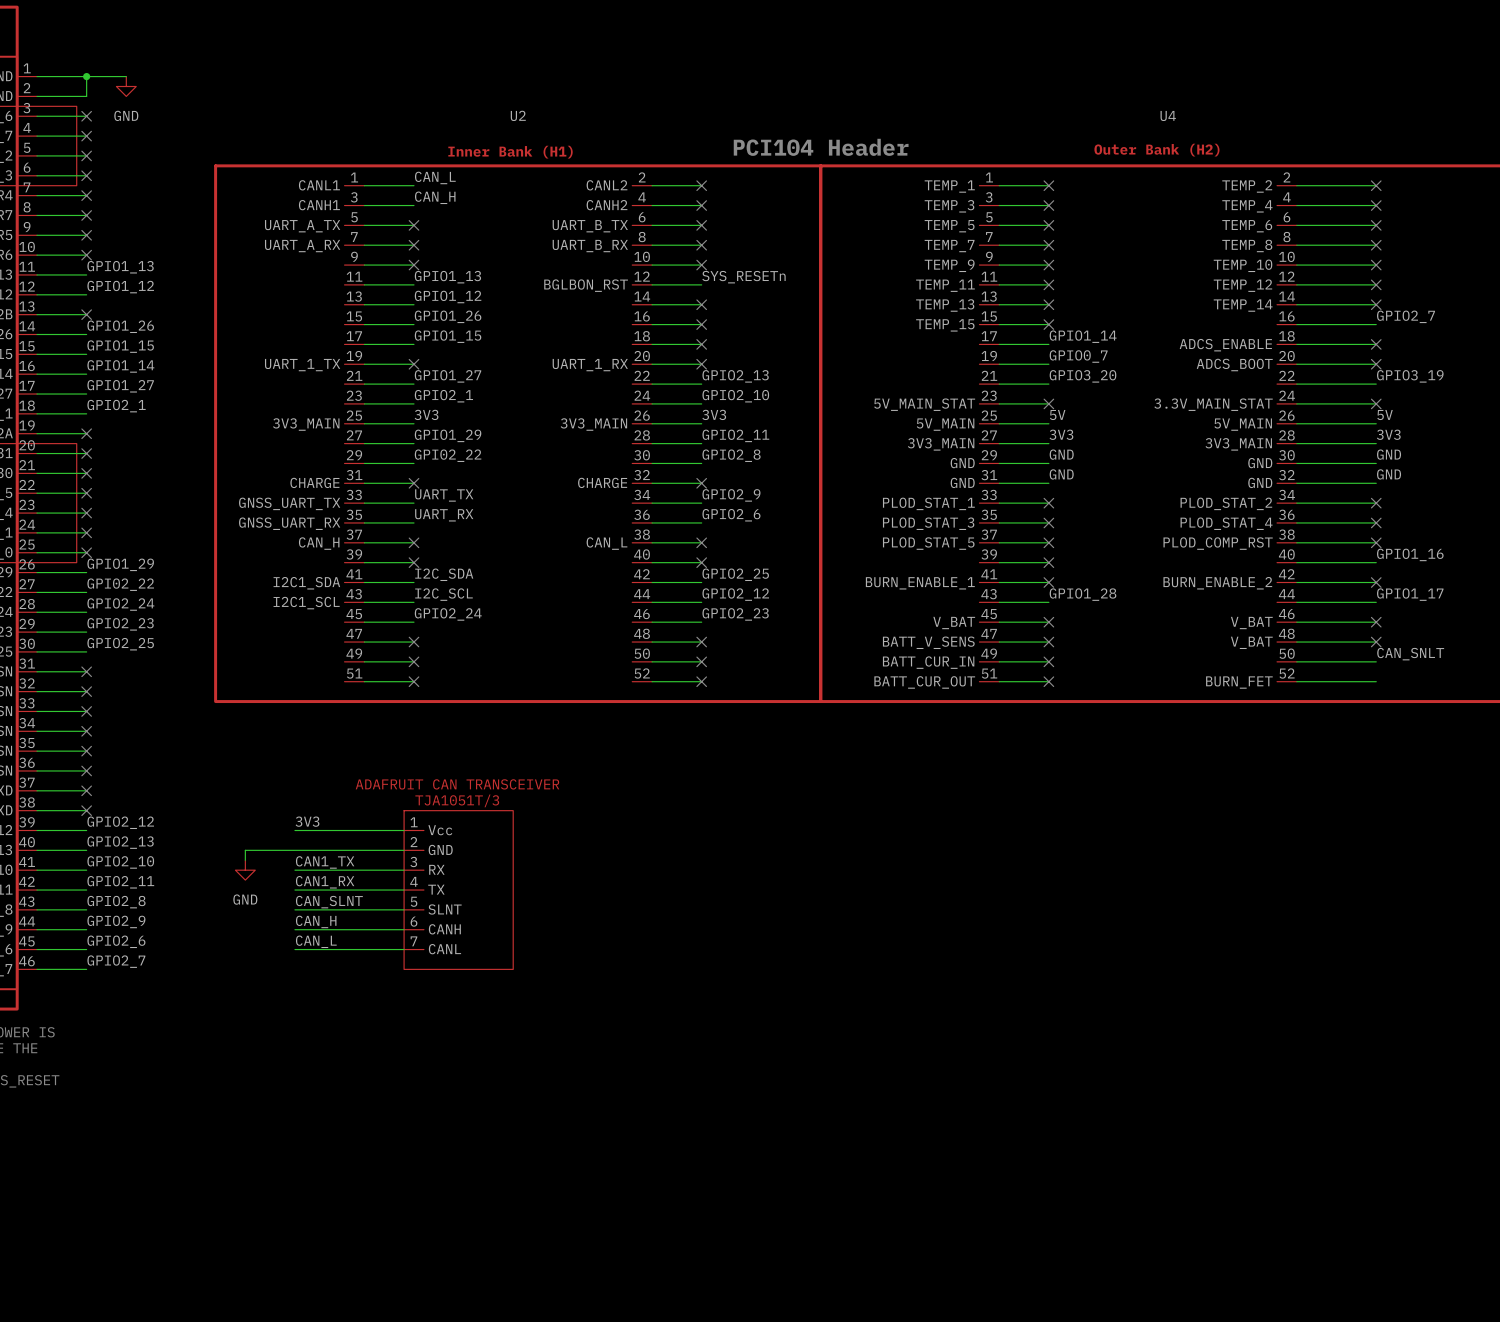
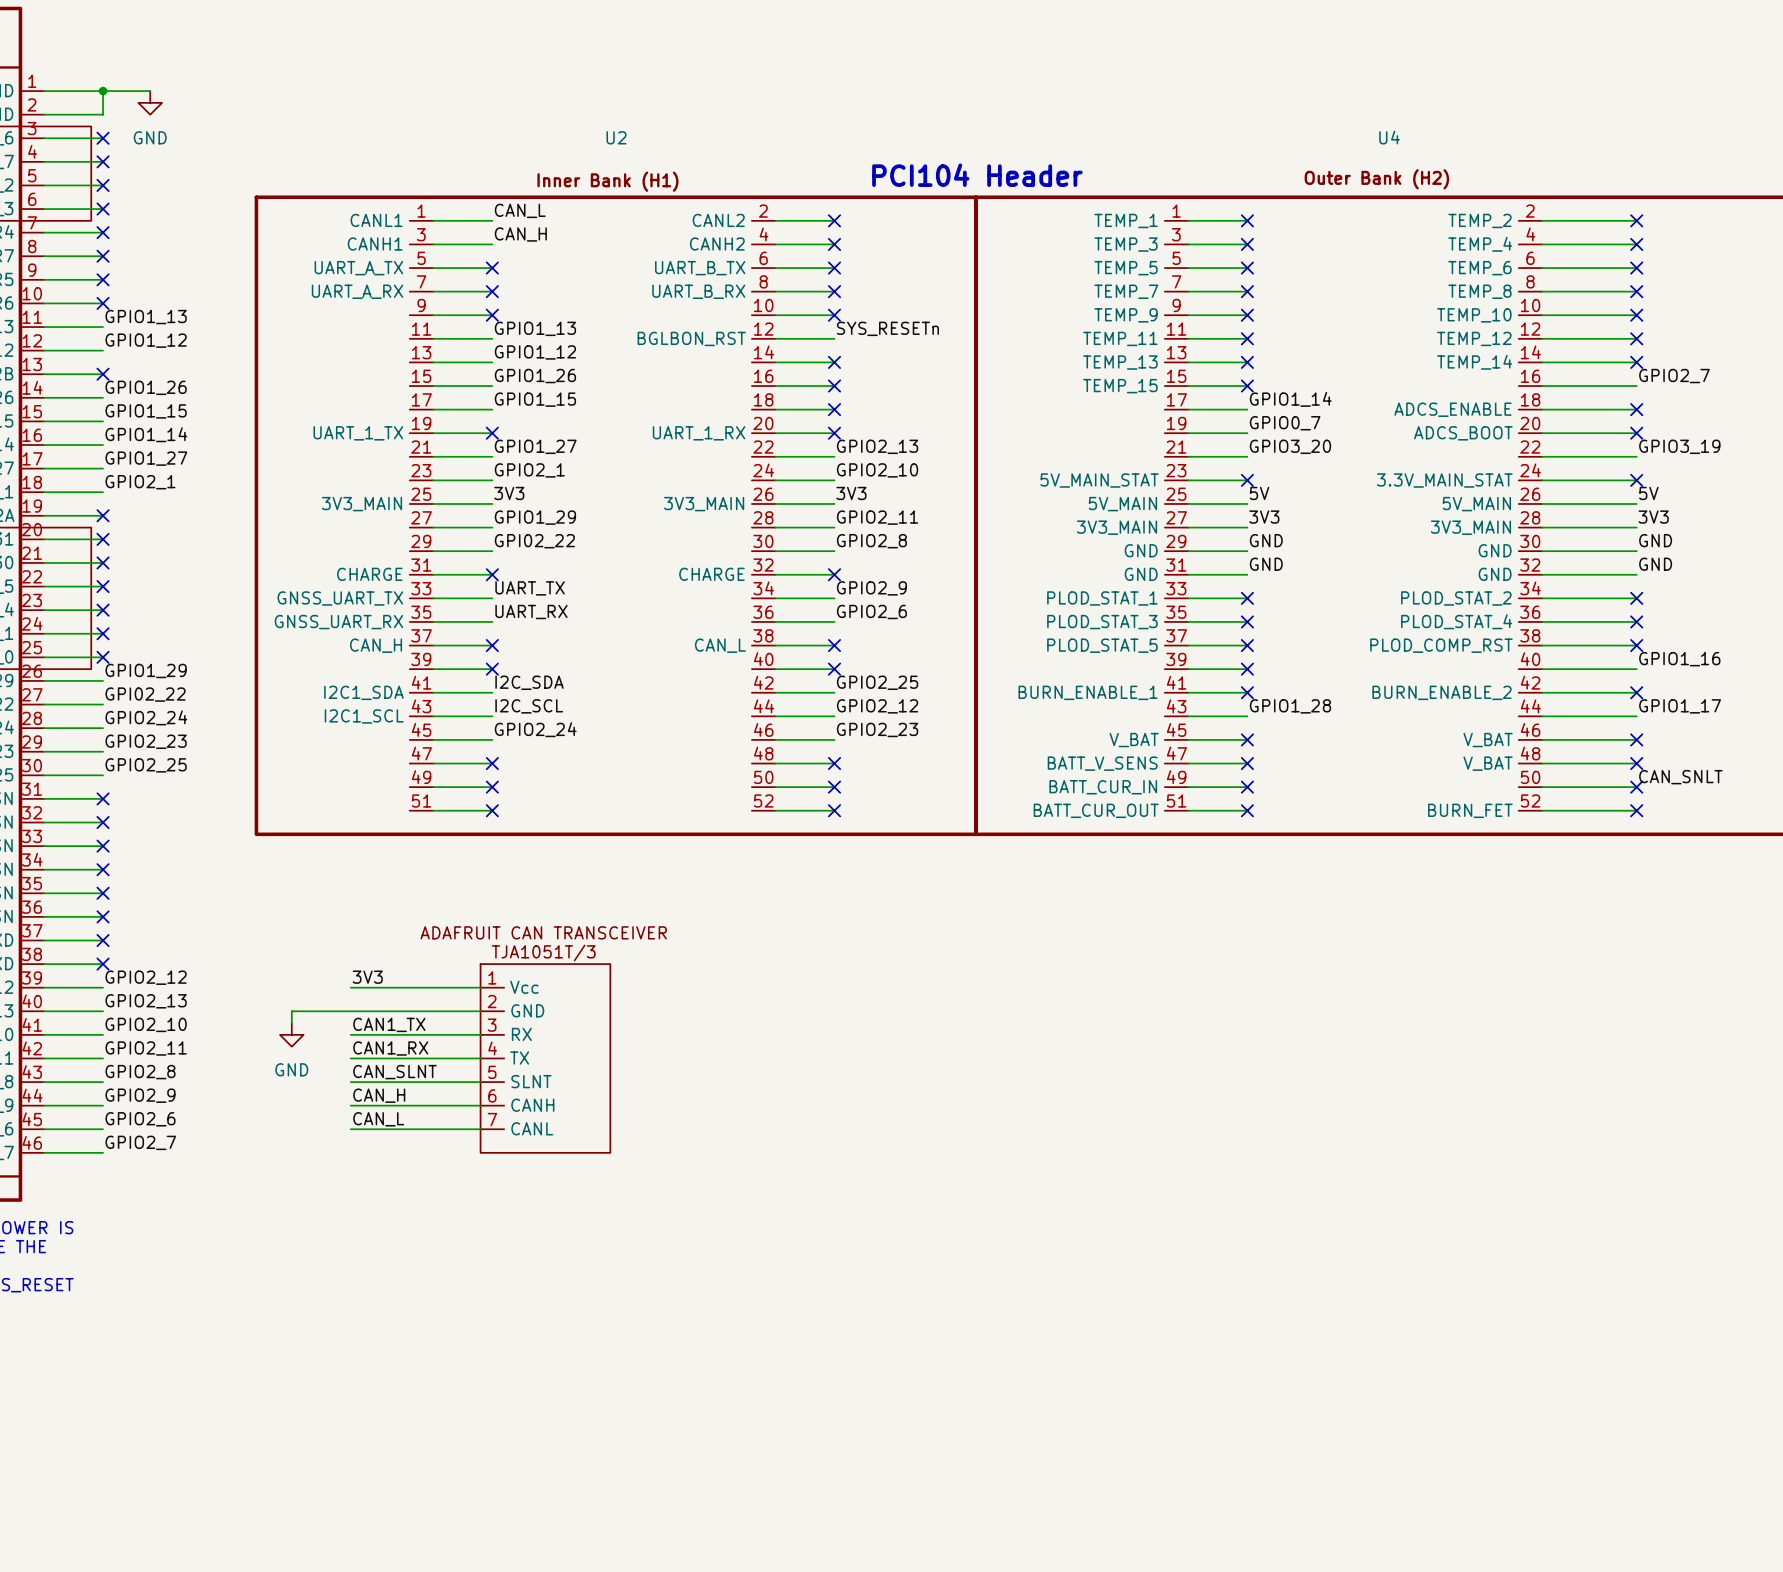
no-connect mark: none -> (1636, 787)
no-connect mark: none -> (1636, 810)

